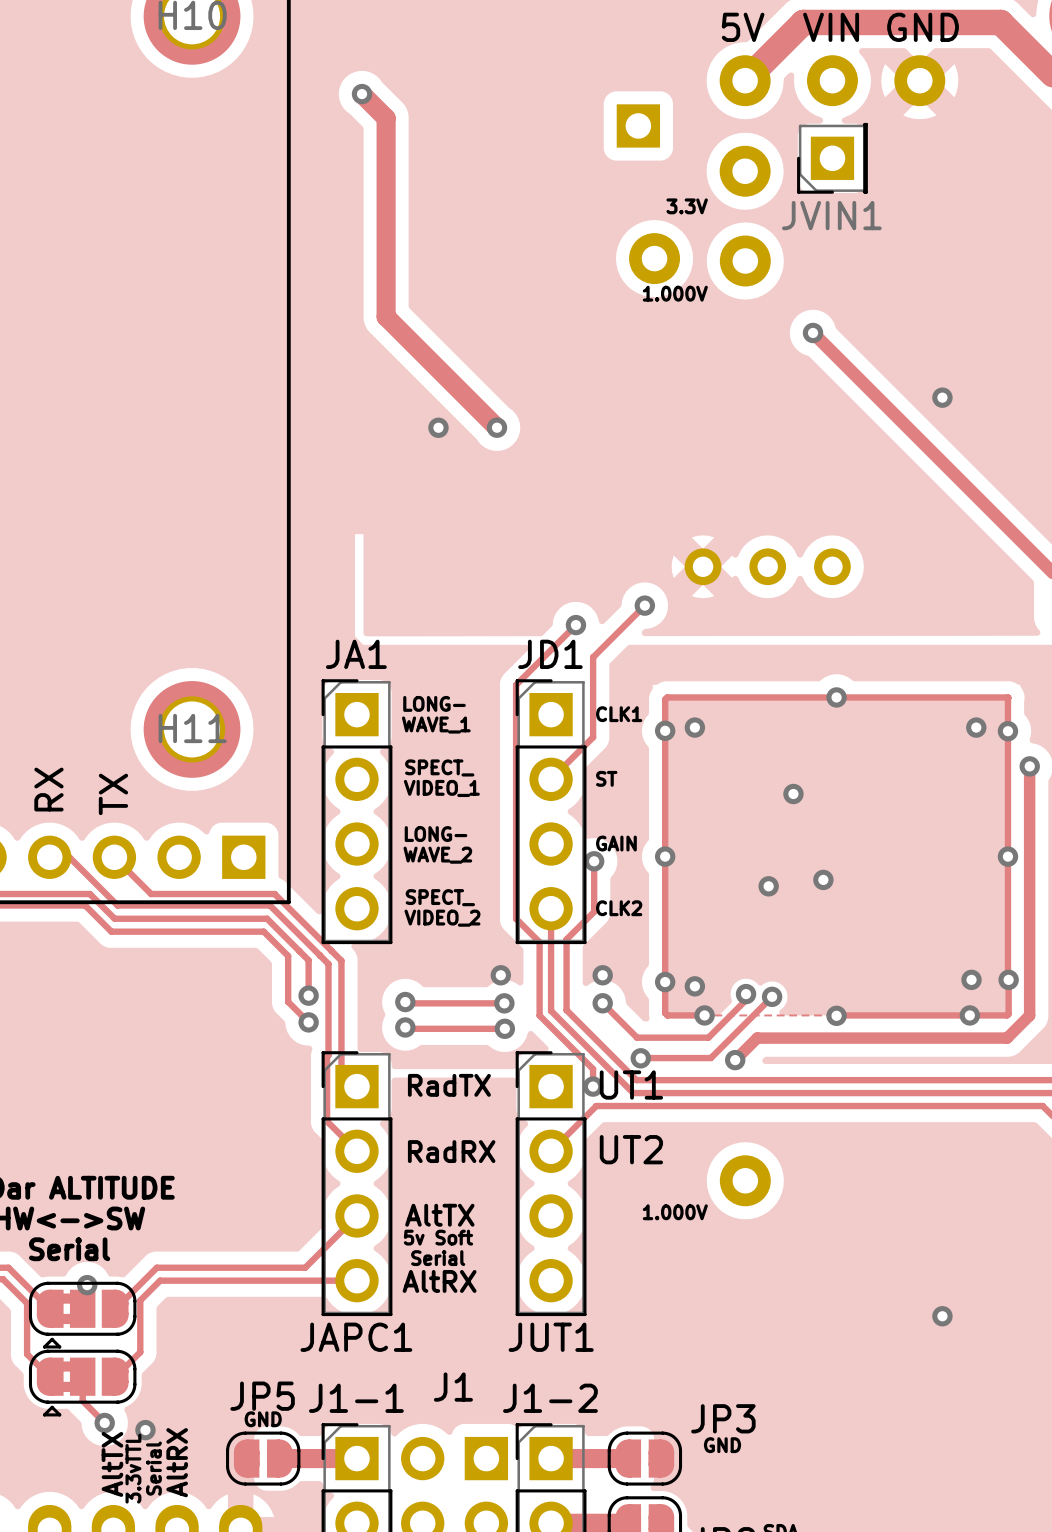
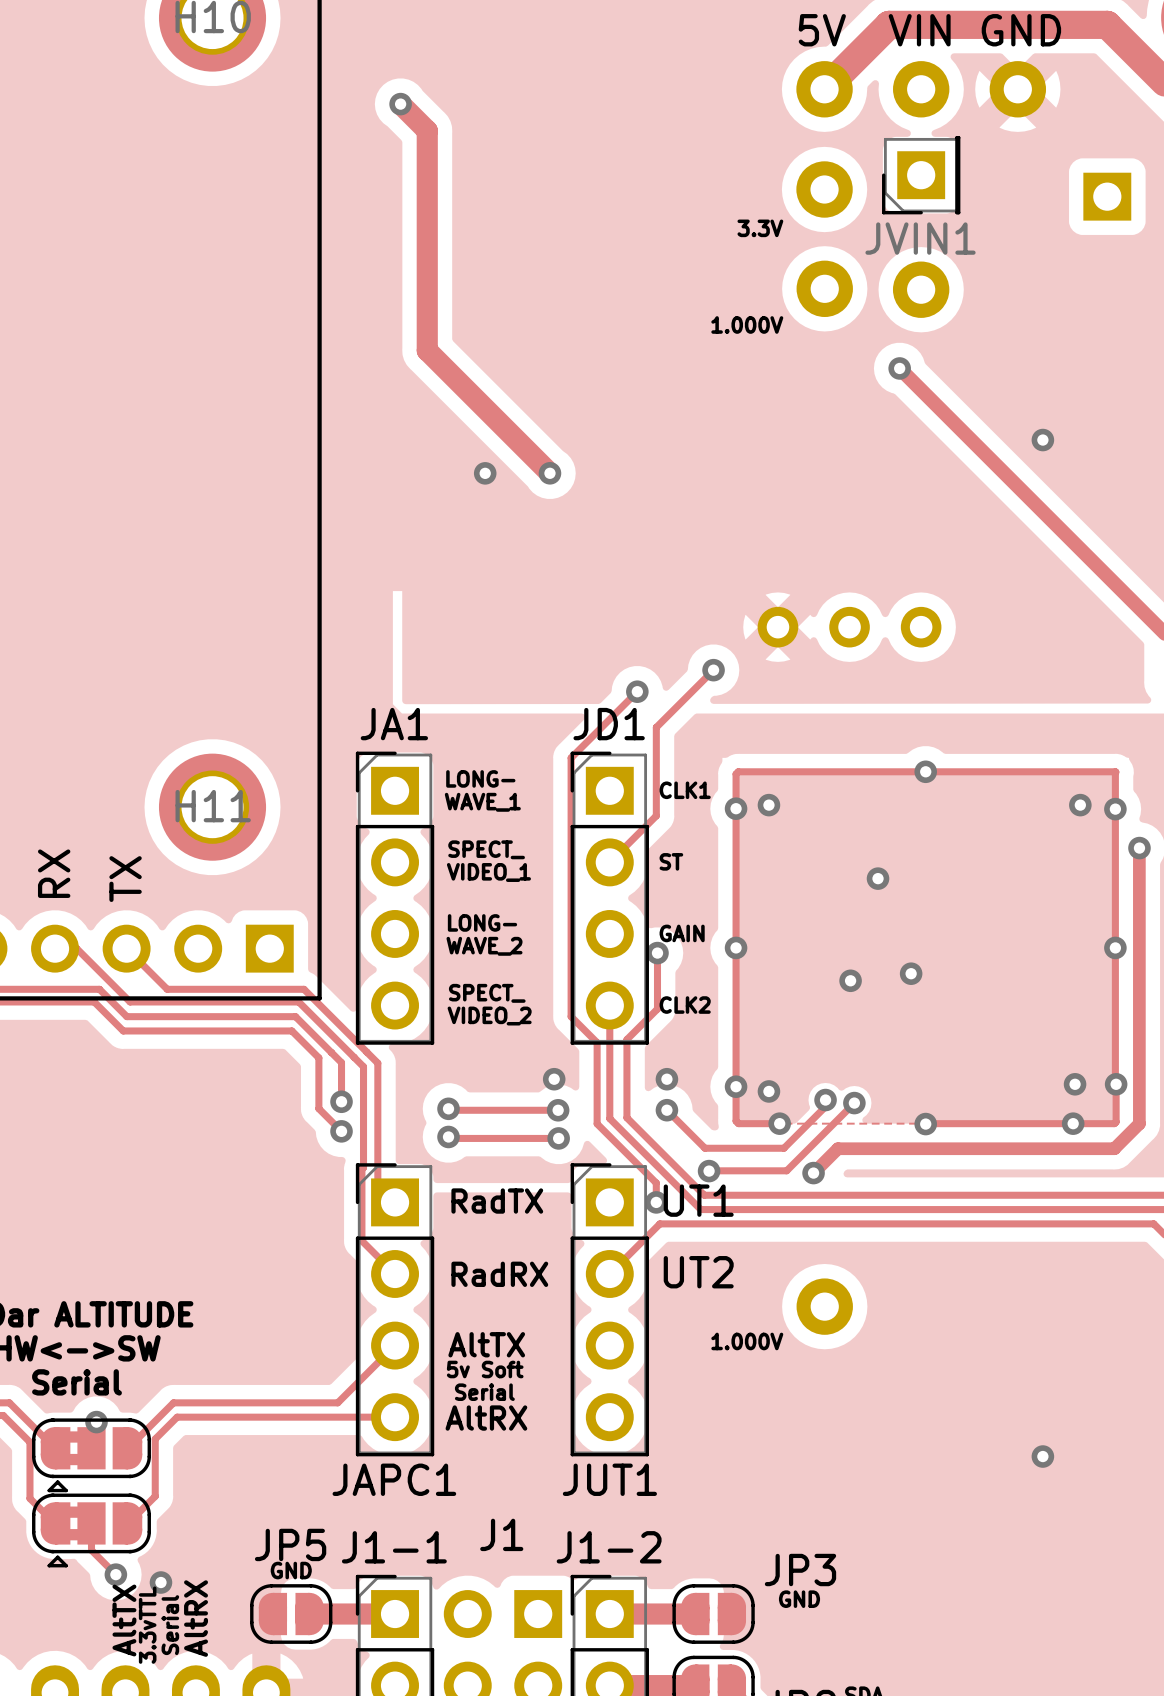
part position: (638, 125) -> (1107, 196)
part position: (654, 258) -> (921, 289)

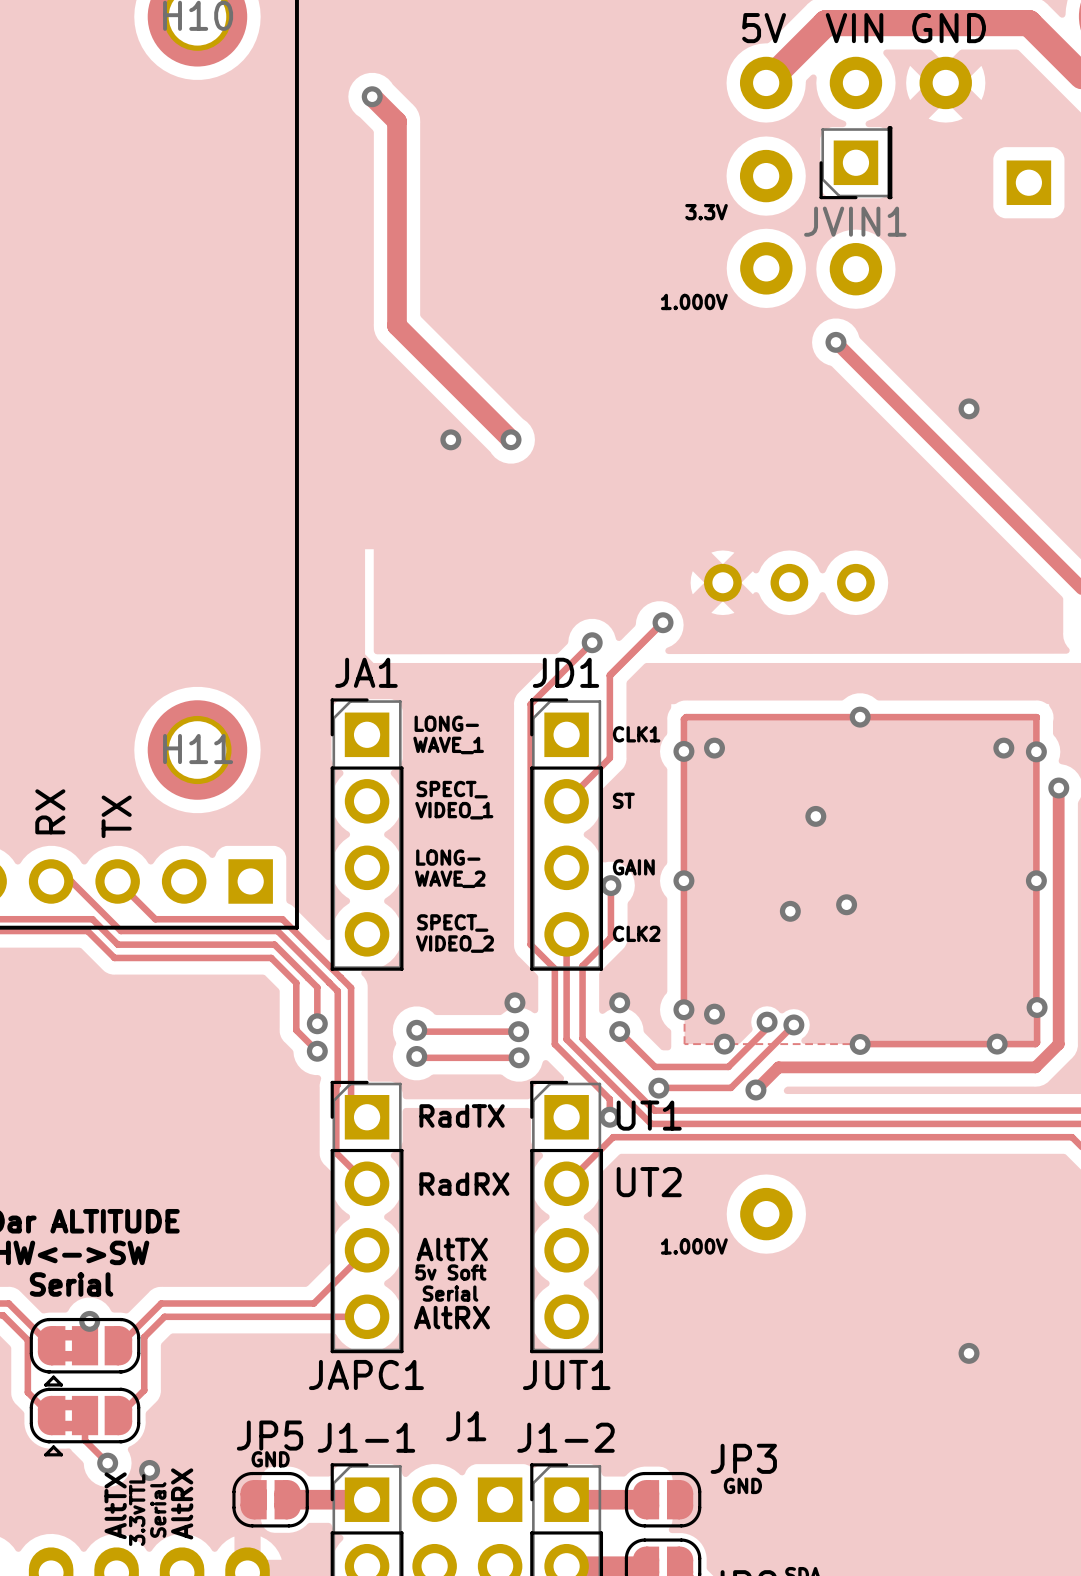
via: (1075, 1084) -> none
track: (736, 1086) (736, 1121) (738, 1123) (779, 1123) -> none

